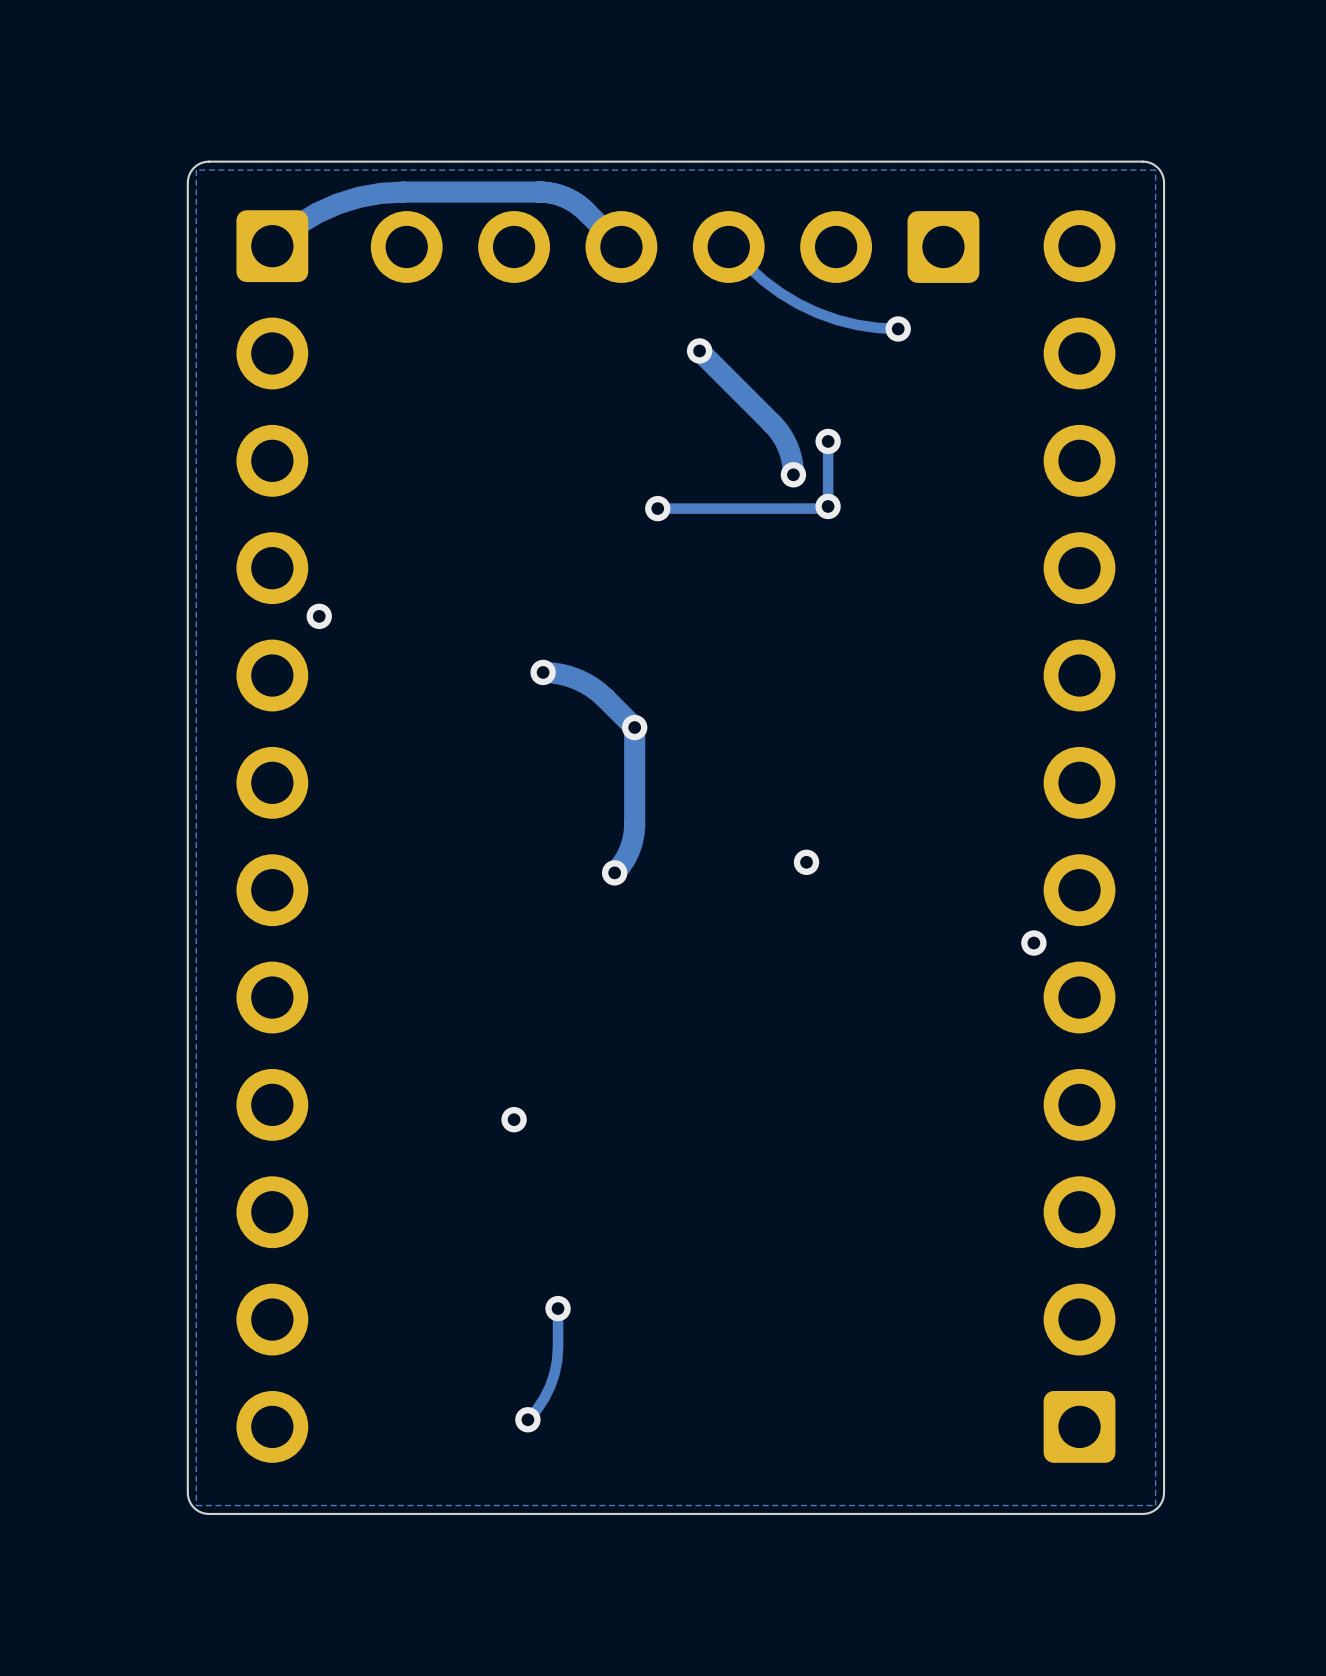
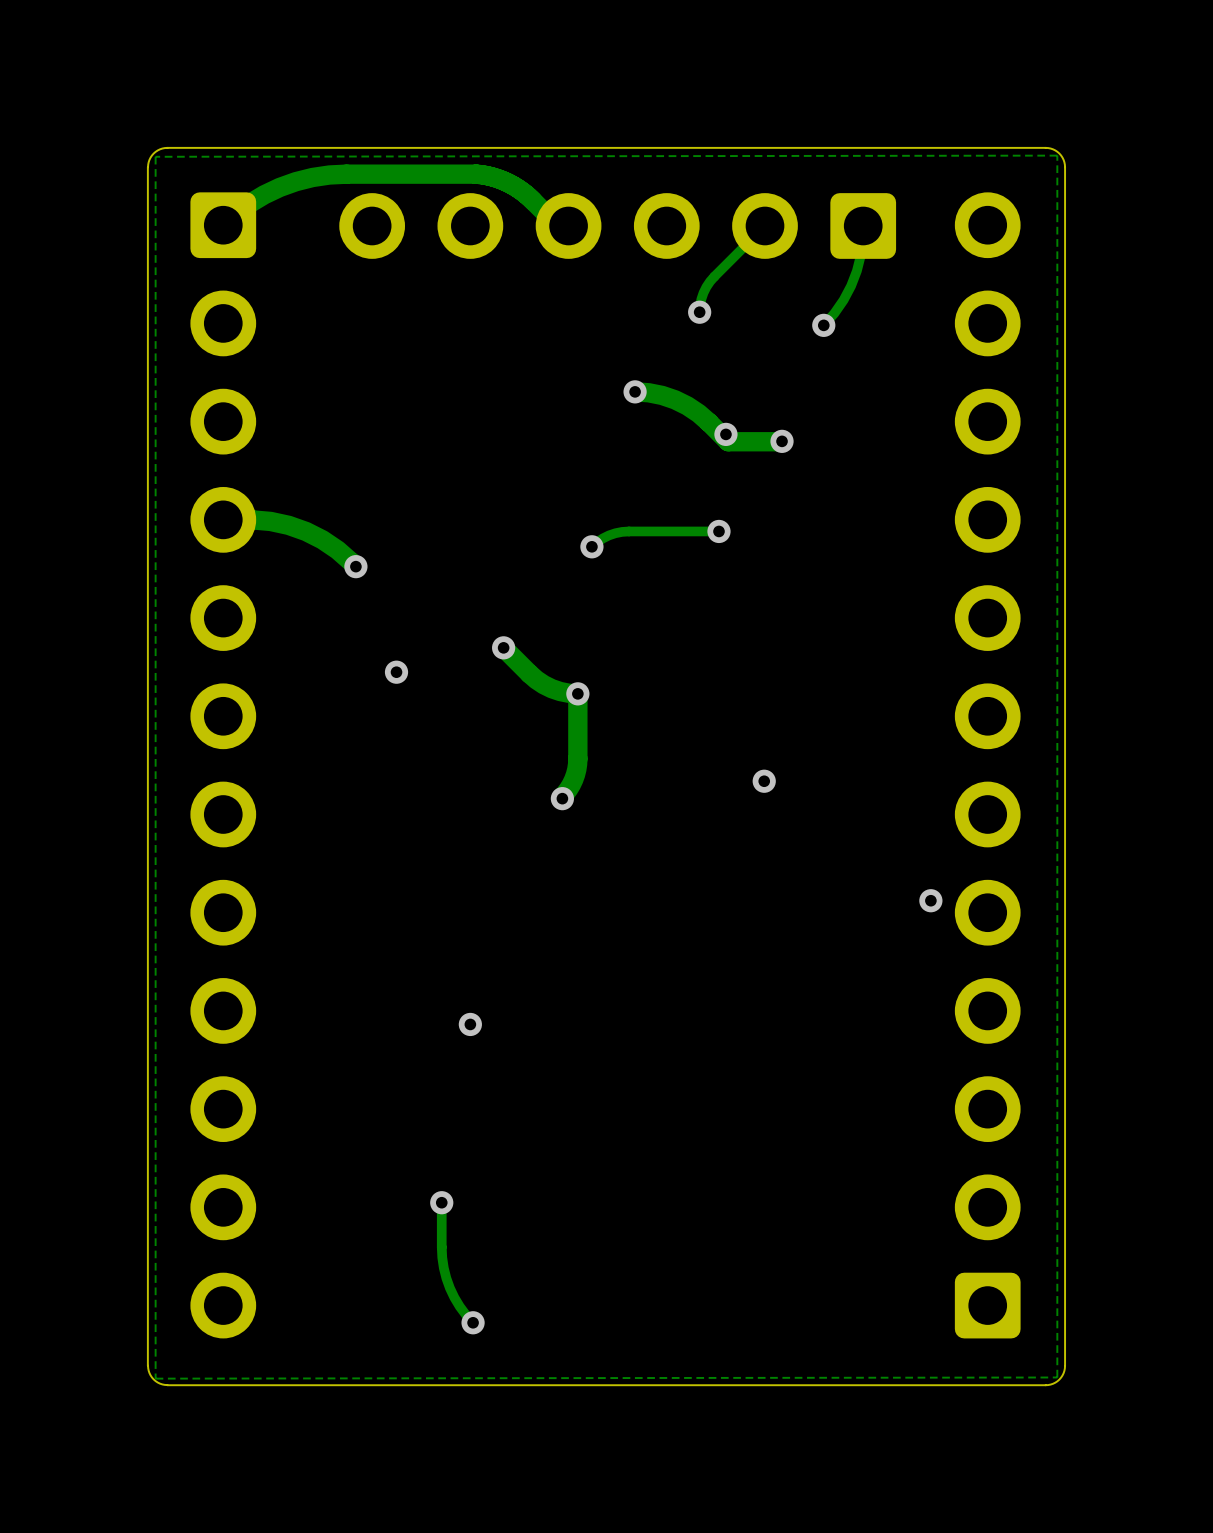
board edge: (208, 161) (200, 163) (194, 167) (189, 174) (187, 182) (187, 1492) (189, 1500) (194, 1507) (200, 1512) (208, 1513) -> (191, 147) (159, 149) (150, 157) (148, 167) (147, 1365) (152, 1377) (159, 1383) (191, 1385)
zone outline: (1155, 170) (196, 170) (196, 1505) (1155, 1505) -> (1057, 155) (155, 156) (155, 1378) (1057, 1377)
track: none -> (556, 224) (520, 190) (506, 182) (490, 176) (476, 174) (346, 174) (312, 177) (279, 187) (249, 203) (223, 225)
track: none -> (753, 224) (753, 237) (706, 287) (701, 299) (699, 312)
track: none -> (851, 224) (862, 236) (856, 270) (843, 300) (823, 325)
track: (272, 246) (298, 224) (317, 212) (359, 197) (402, 192) (539, 192) (558, 194) (576, 203) (621, 246) -> none
track: (728, 246) (764, 281) (798, 304) (817, 312) (857, 324) (898, 328) -> none
via position: (898, 328) -> (823, 325)
via: none -> (699, 312)
track: (699, 350) (776, 428) (790, 453) (793, 474) -> none
via: (699, 350) -> none
track: none -> (635, 391) (662, 395) (687, 405) (698, 413) (728, 441) (781, 441)
via: none -> (635, 391)
track: (828, 441) (828, 506) (825, 508) (657, 508) -> none
via: (828, 441) -> none
via: none -> (782, 441)
via: (828, 506) -> none
via: (657, 508) -> none
track: none -> (223, 519) (252, 519) (288, 525) (322, 539) (337, 550) (355, 566)
track: none -> (718, 531) (622, 531) (602, 538) (591, 546)
via: none -> (718, 531)
via: none -> (591, 546)
via position: (319, 616) -> (355, 566)
track: (543, 672) (568, 676) (592, 687) (634, 727) (634, 833) (625, 858) (614, 872) -> none
via position: (543, 672) -> (503, 647)
track: none -> (503, 647) (529, 673) (543, 684) (560, 691) (577, 693) (576, 769) (571, 784) (562, 797)
via position: (634, 727) -> (577, 693)
via: none -> (396, 672)
part position: (272, 836) -> (223, 765)
via position: (806, 862) -> (764, 781)
via position: (1033, 943) -> (930, 900)
track: (558, 1308) (558, 1347) (554, 1373) (544, 1398) (527, 1419) -> none
via: (558, 1308) -> none
track: none -> (441, 1202) (442, 1257) (446, 1278) (454, 1297) (473, 1322)
via: none -> (441, 1202)
via position: (527, 1419) -> (473, 1322)

